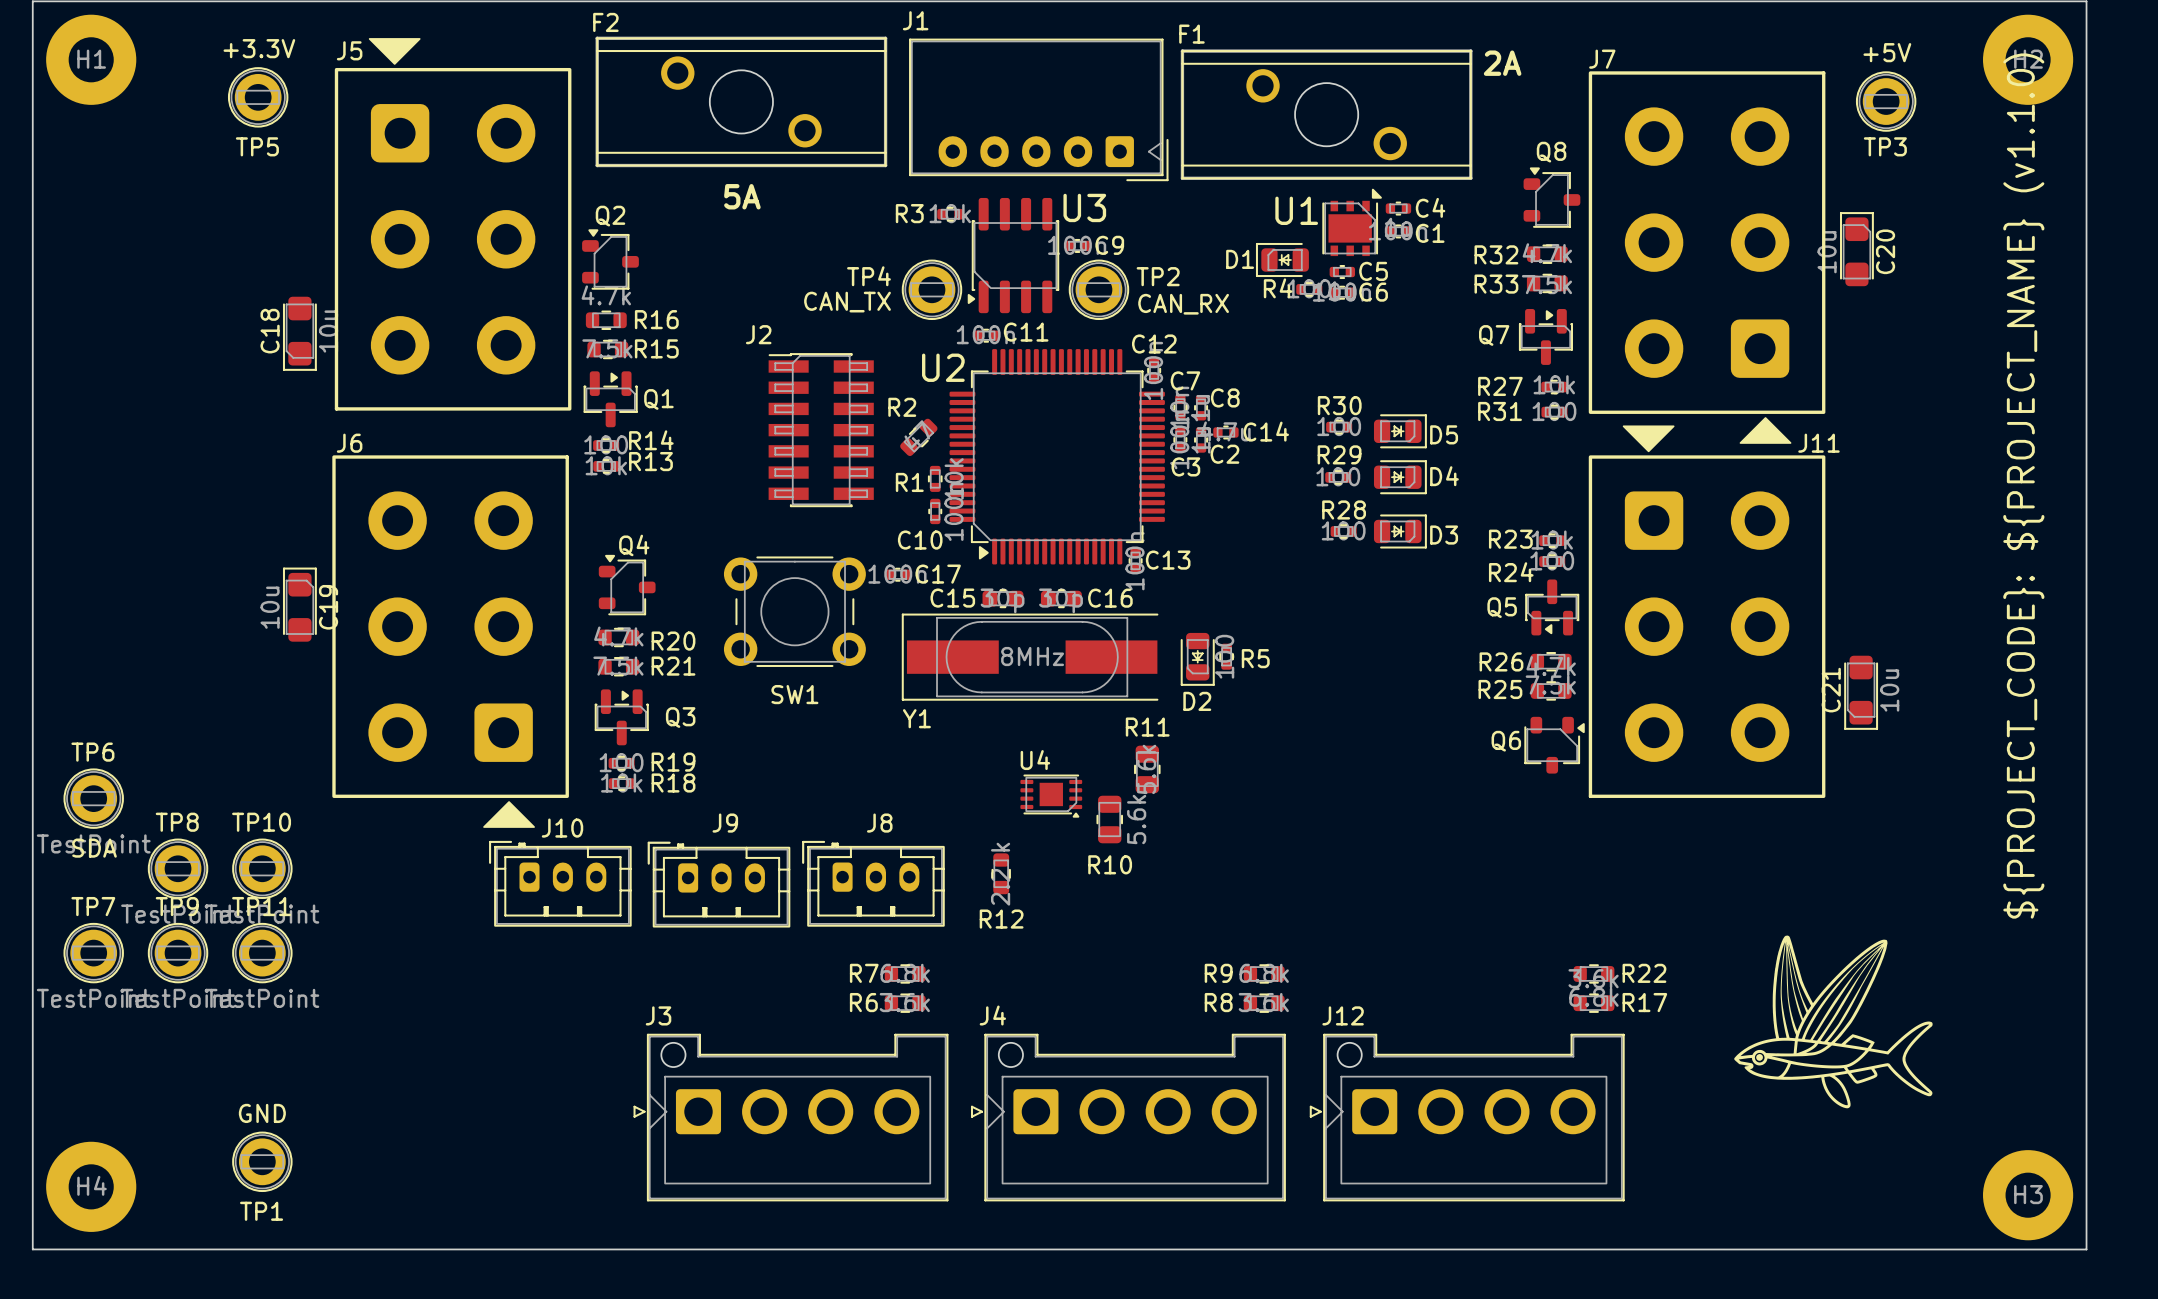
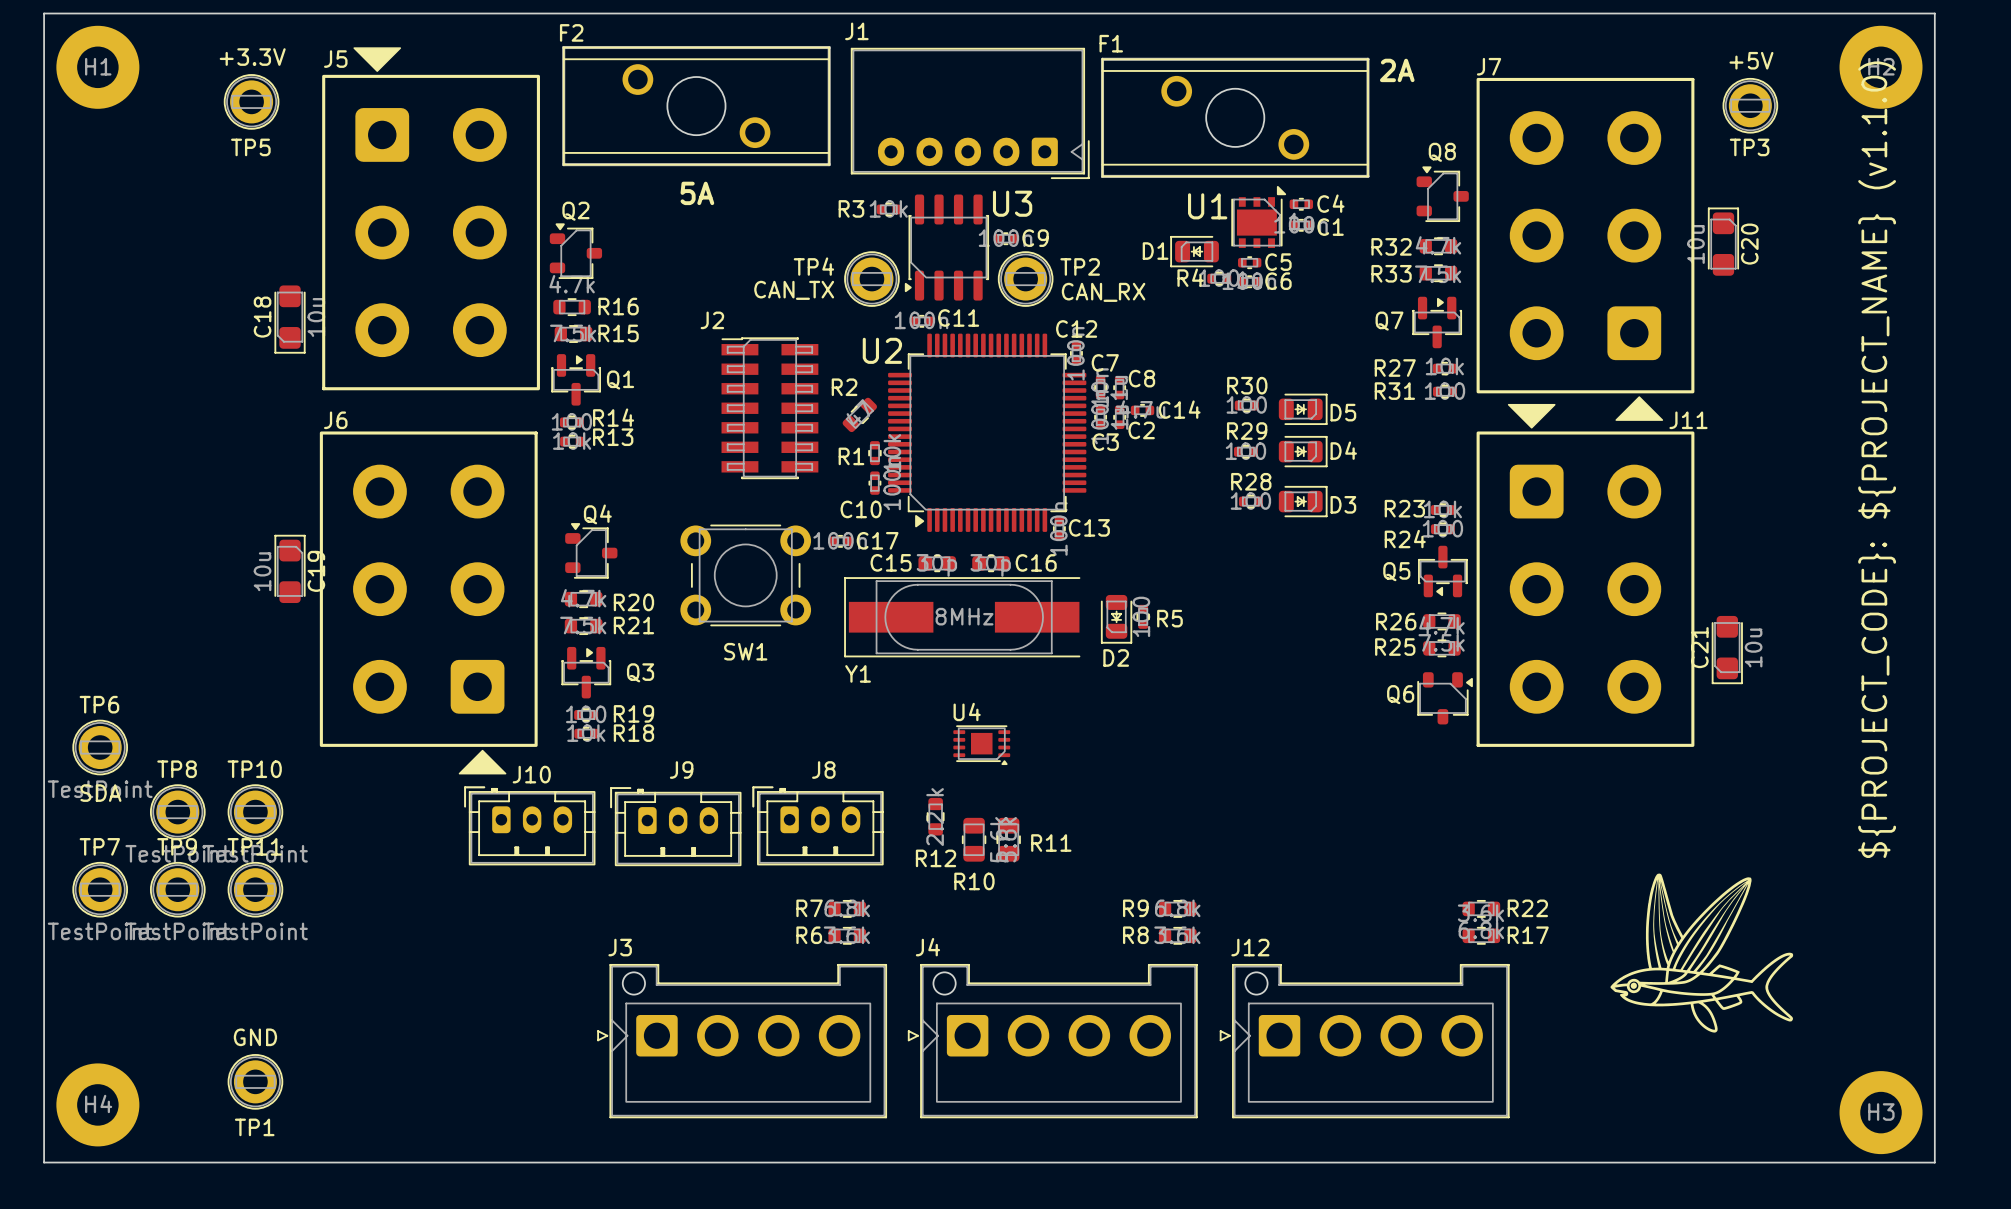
R11 name position: R11 (1147, 727) -> R11 (1051, 843)
R11 position: (1147, 769) -> (1008, 839)
R10 position: (1109, 819) -> (974, 839)

